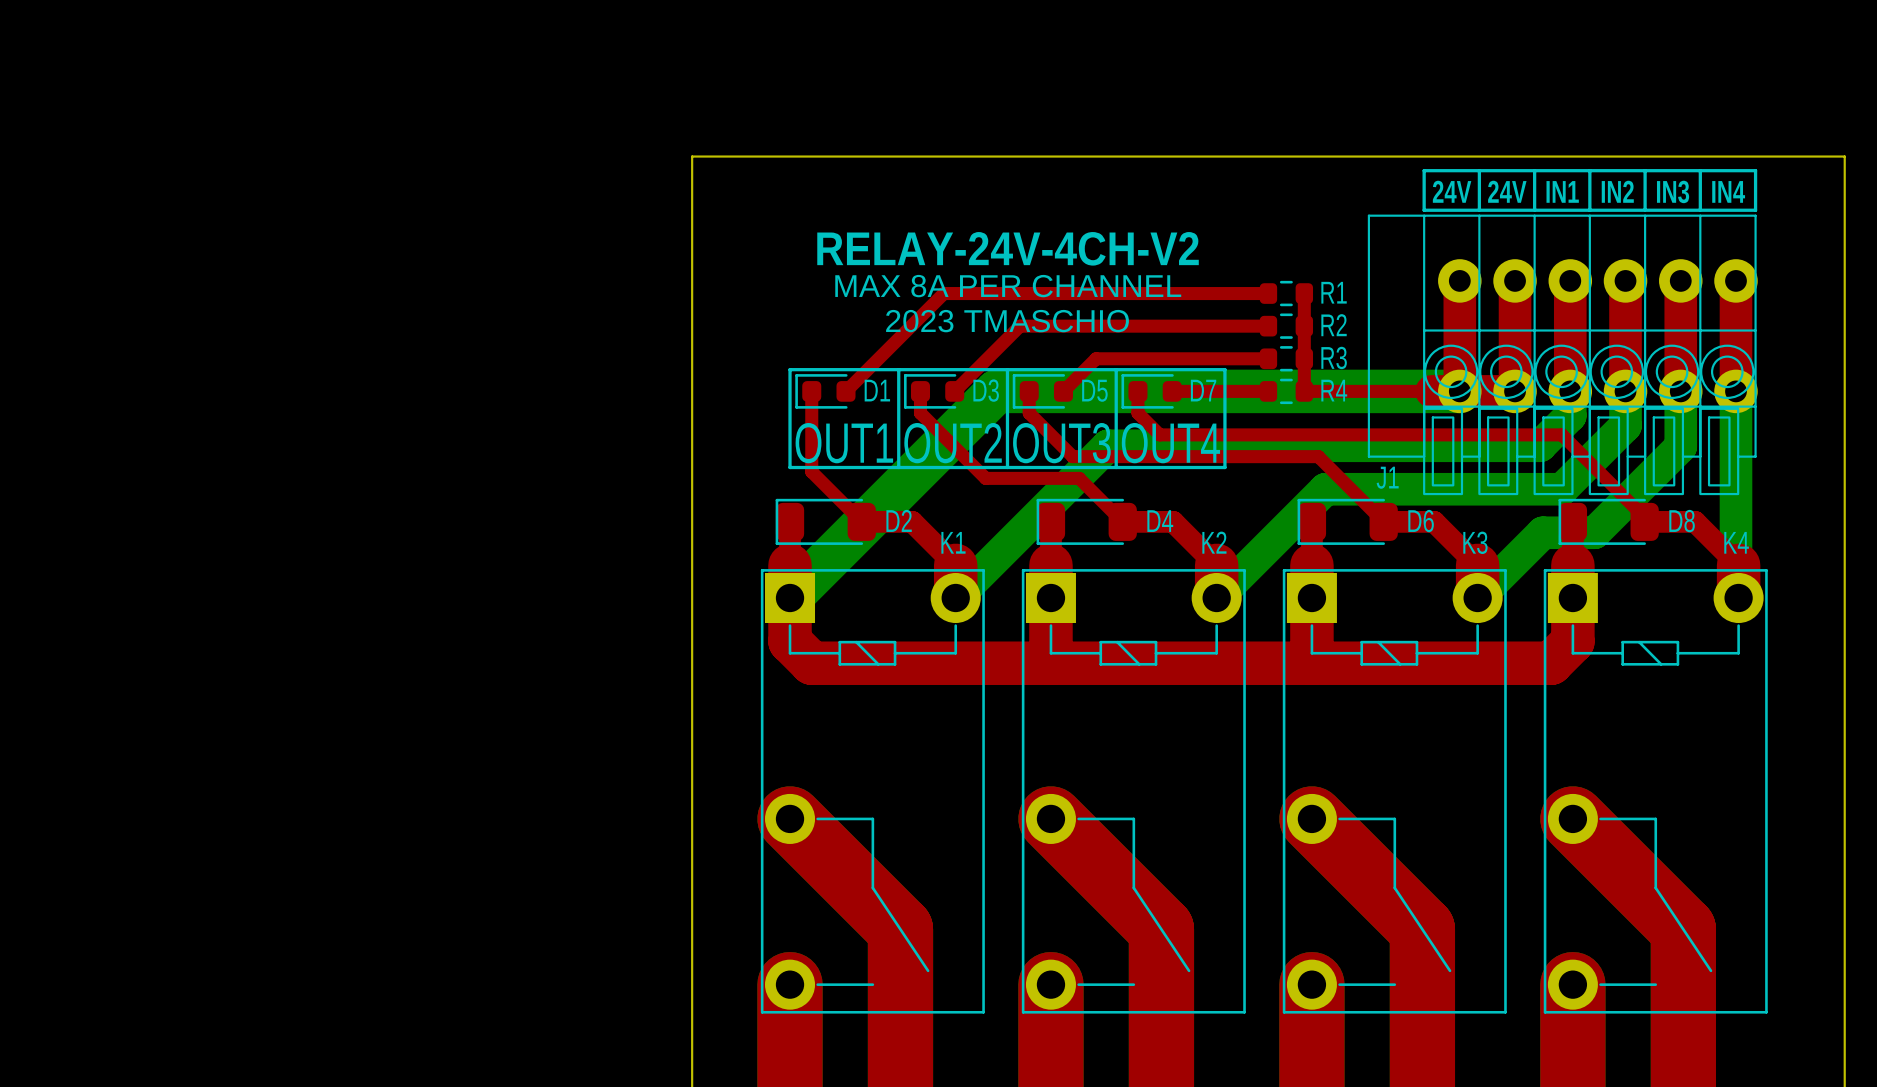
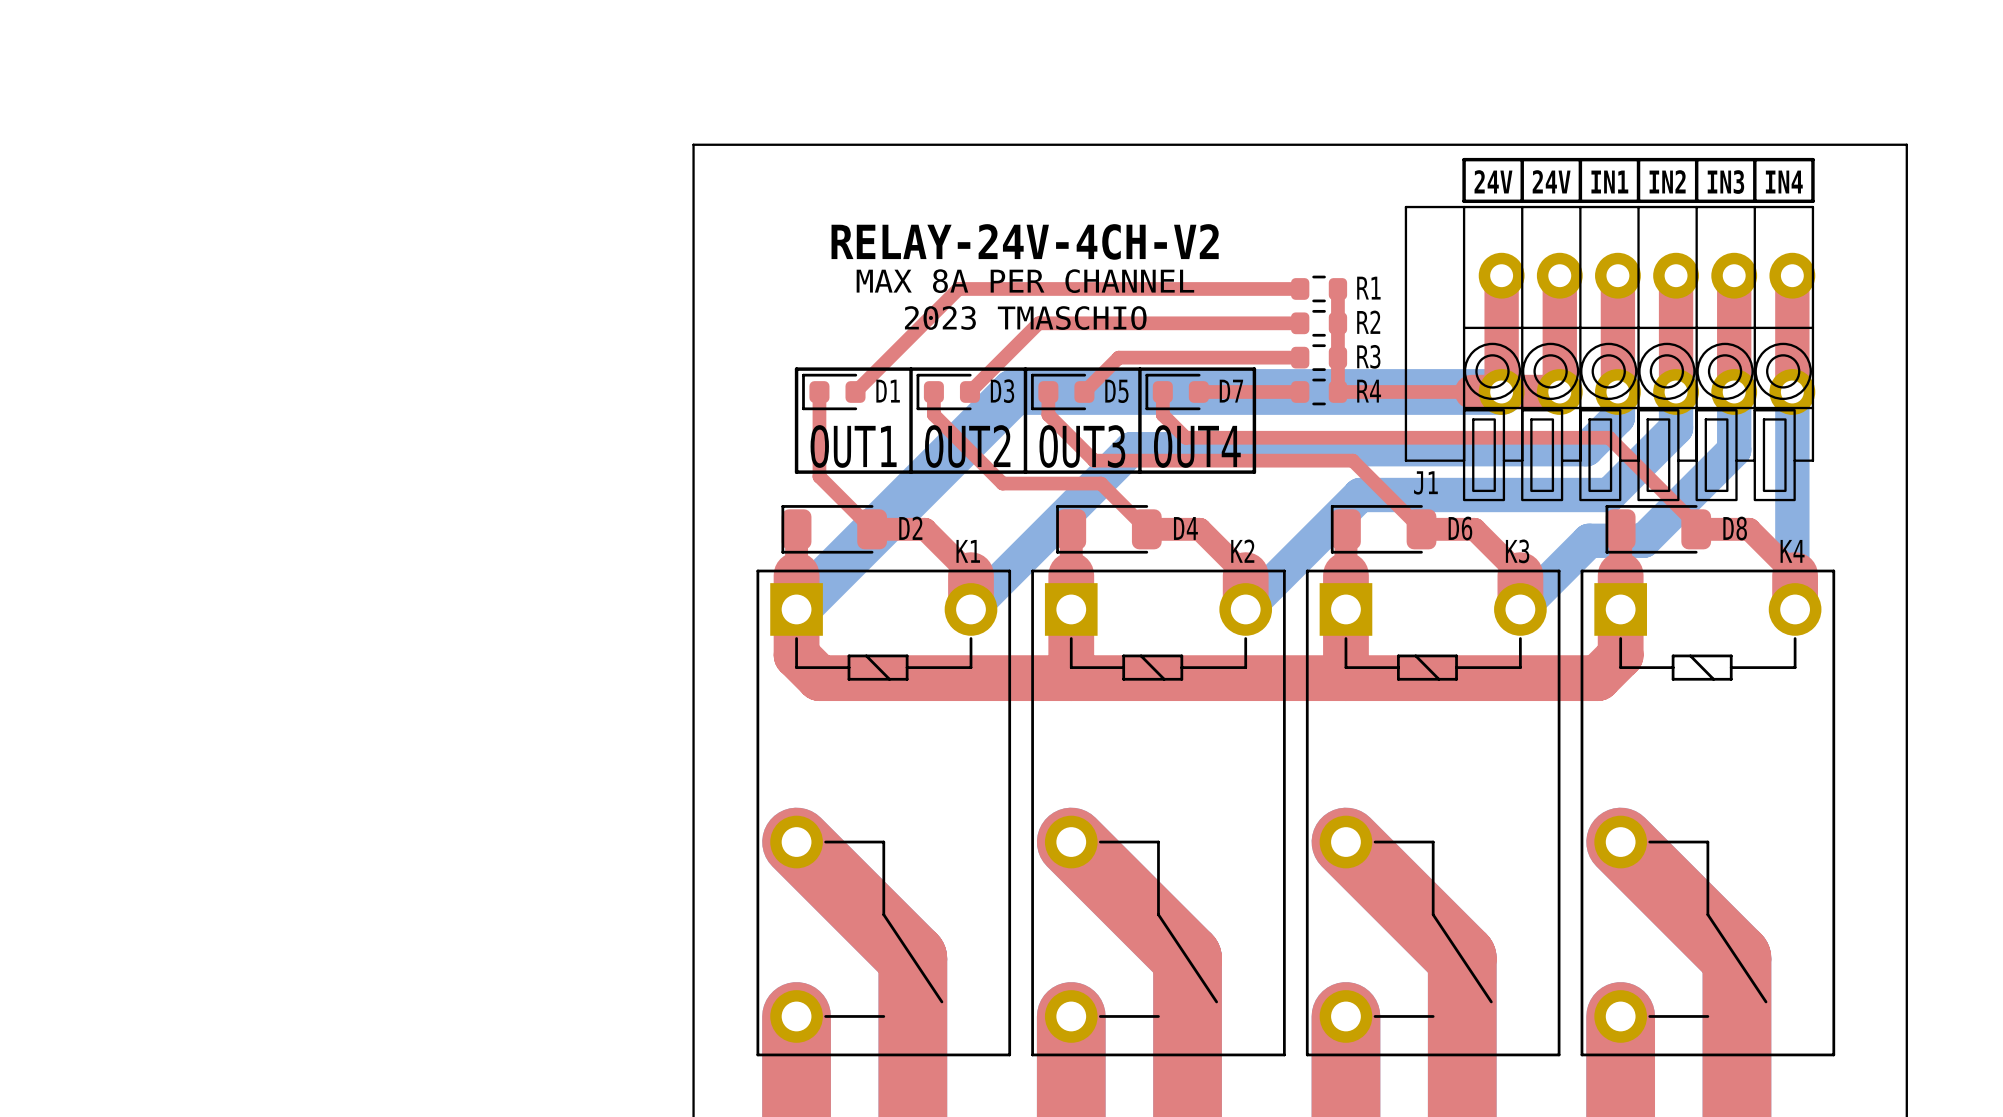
K1 footprint: [760, 569, 985, 1014] -> [756, 569, 1012, 1057]
K2 footprint: [1021, 569, 1246, 1014] -> [1031, 569, 1286, 1057]
K3 footprint: [1282, 569, 1507, 1014] -> [1305, 569, 1561, 1057]
K4 footprint: [1543, 569, 1768, 1014] -> [1580, 569, 1836, 1057]

